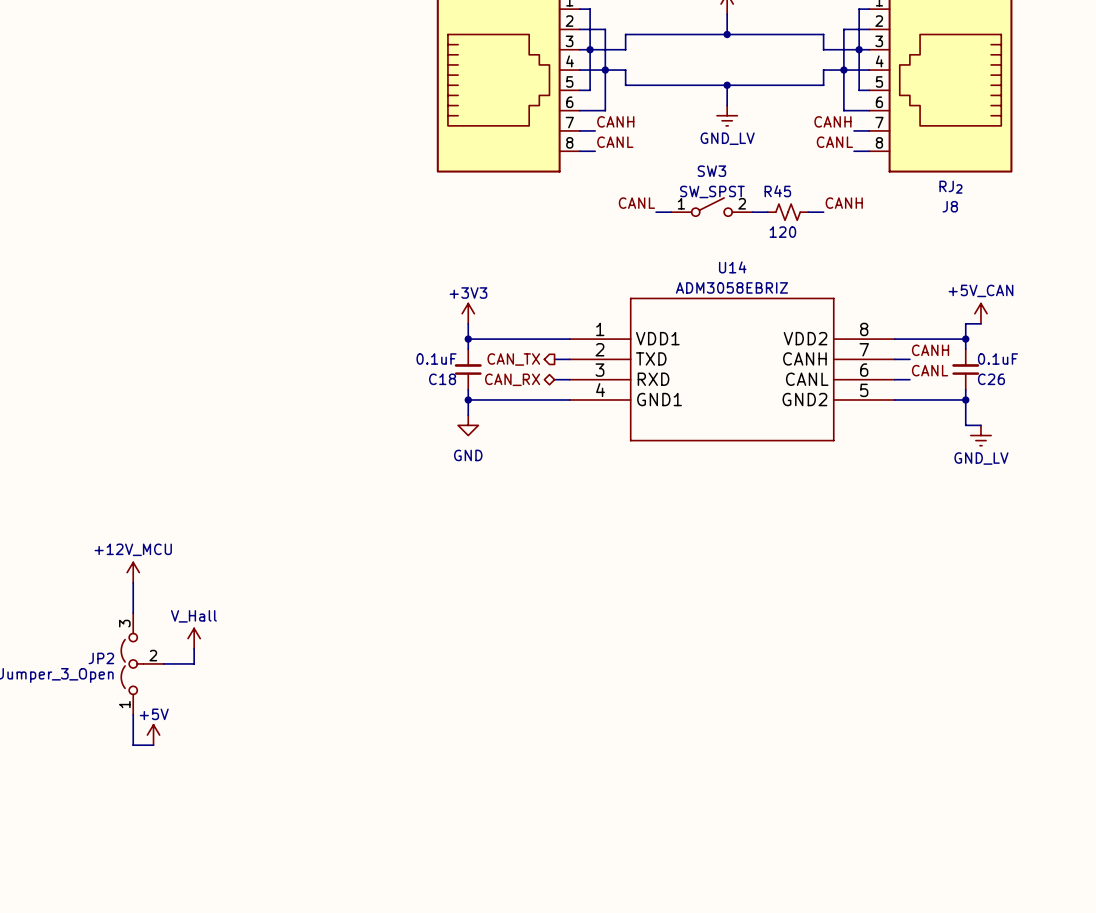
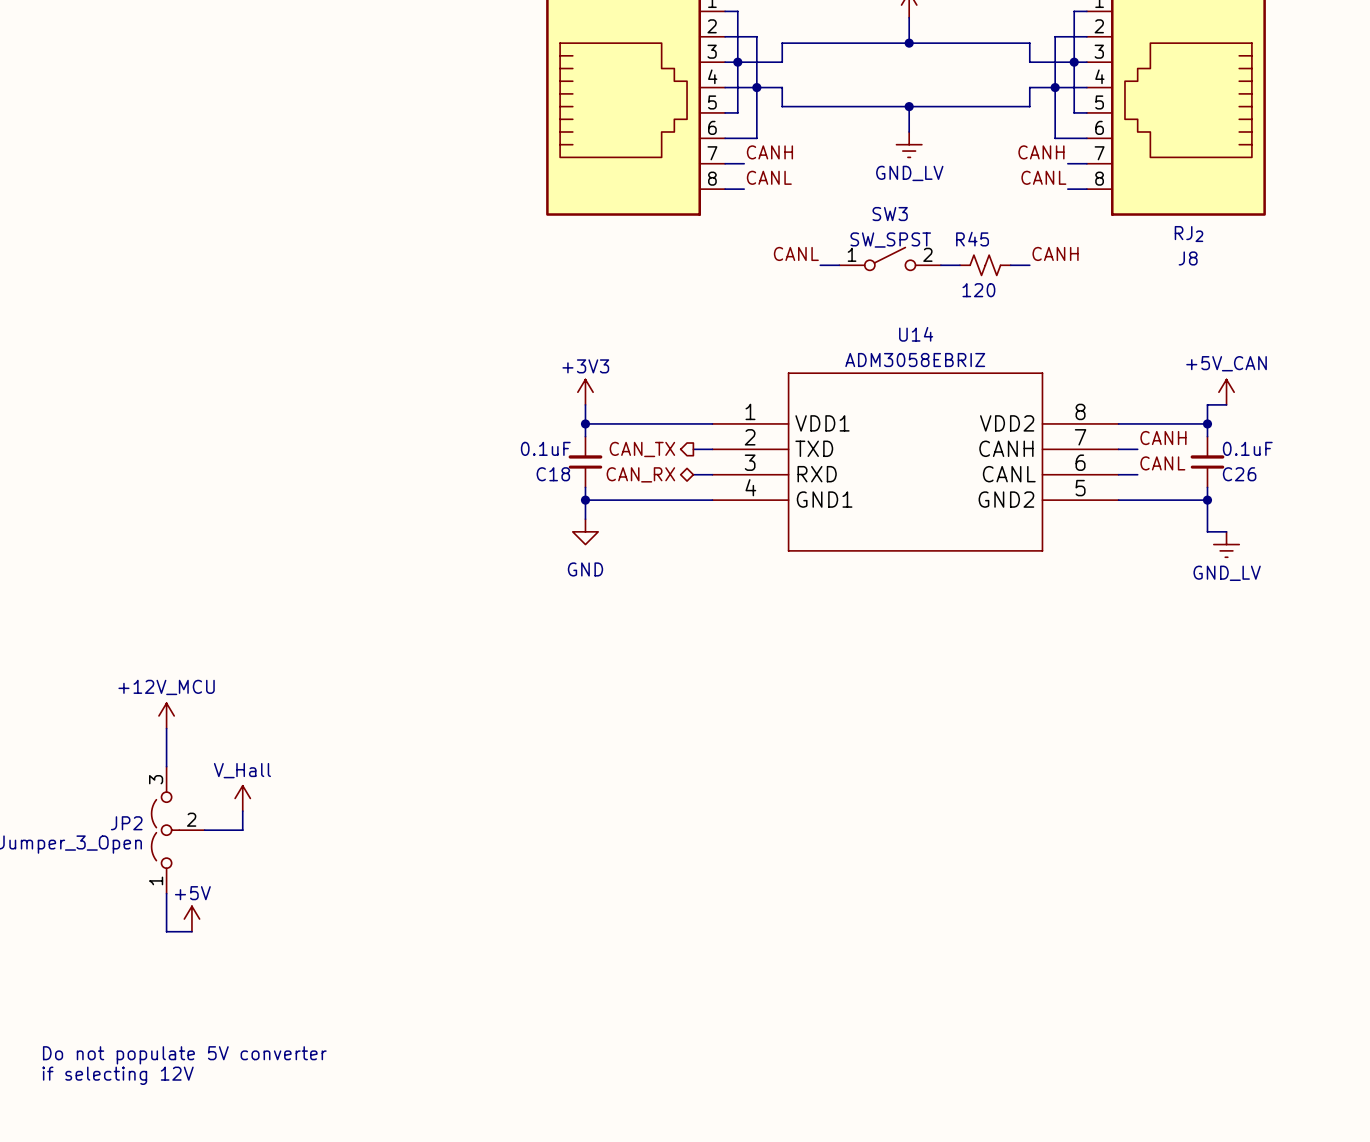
text: none -> Do not populate 5V converter (184, 1055)
text: none -> if selecting 12V (118, 1075)

